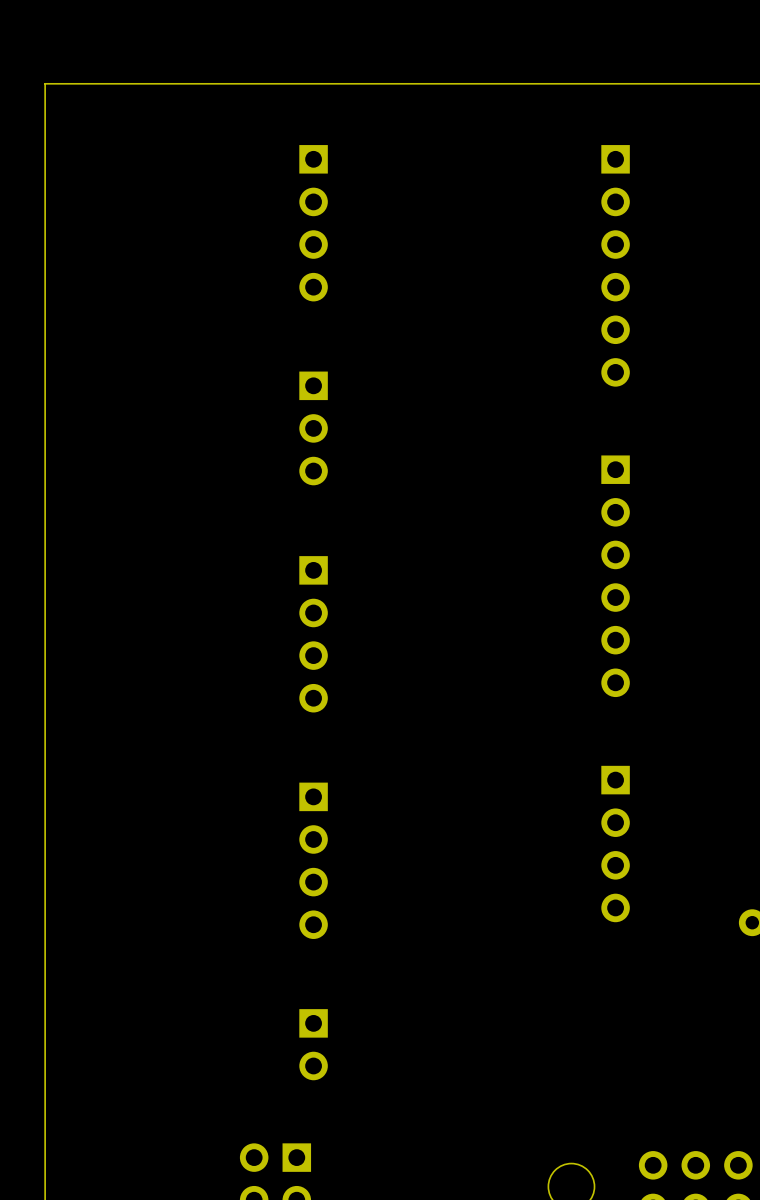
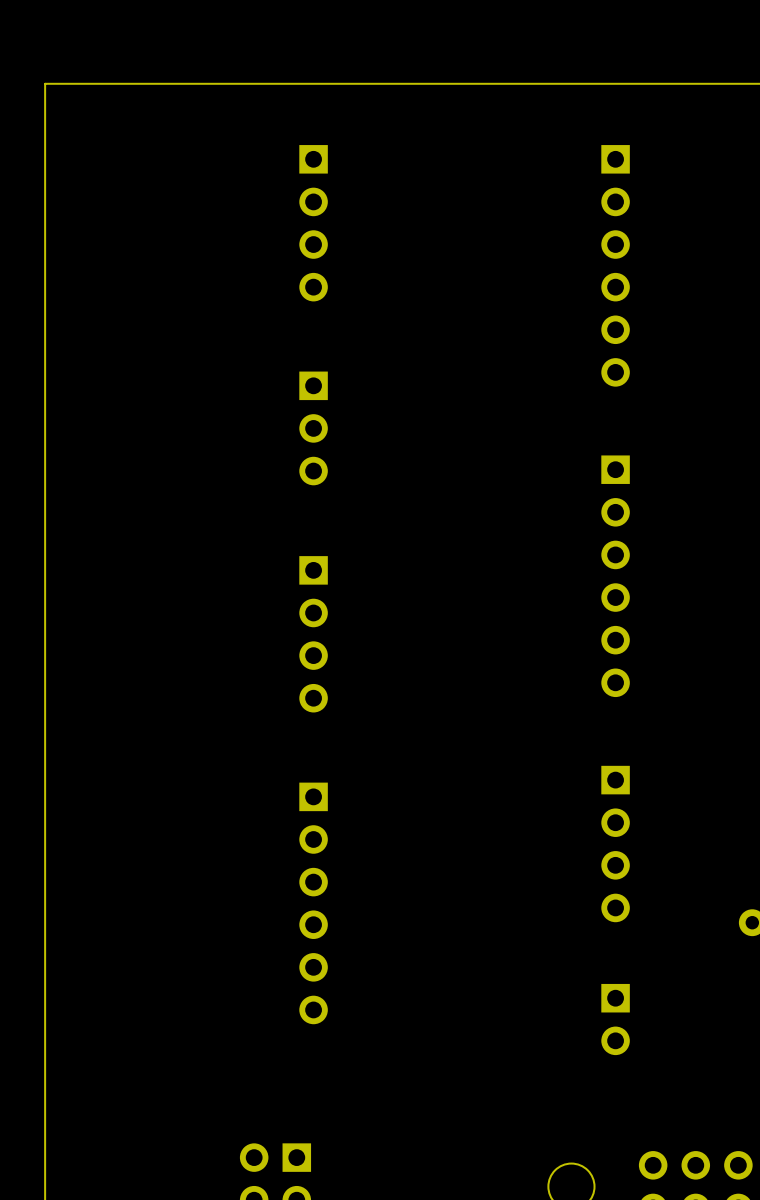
part: none -> (313, 903)
part position: (313, 1044) -> (615, 1019)

